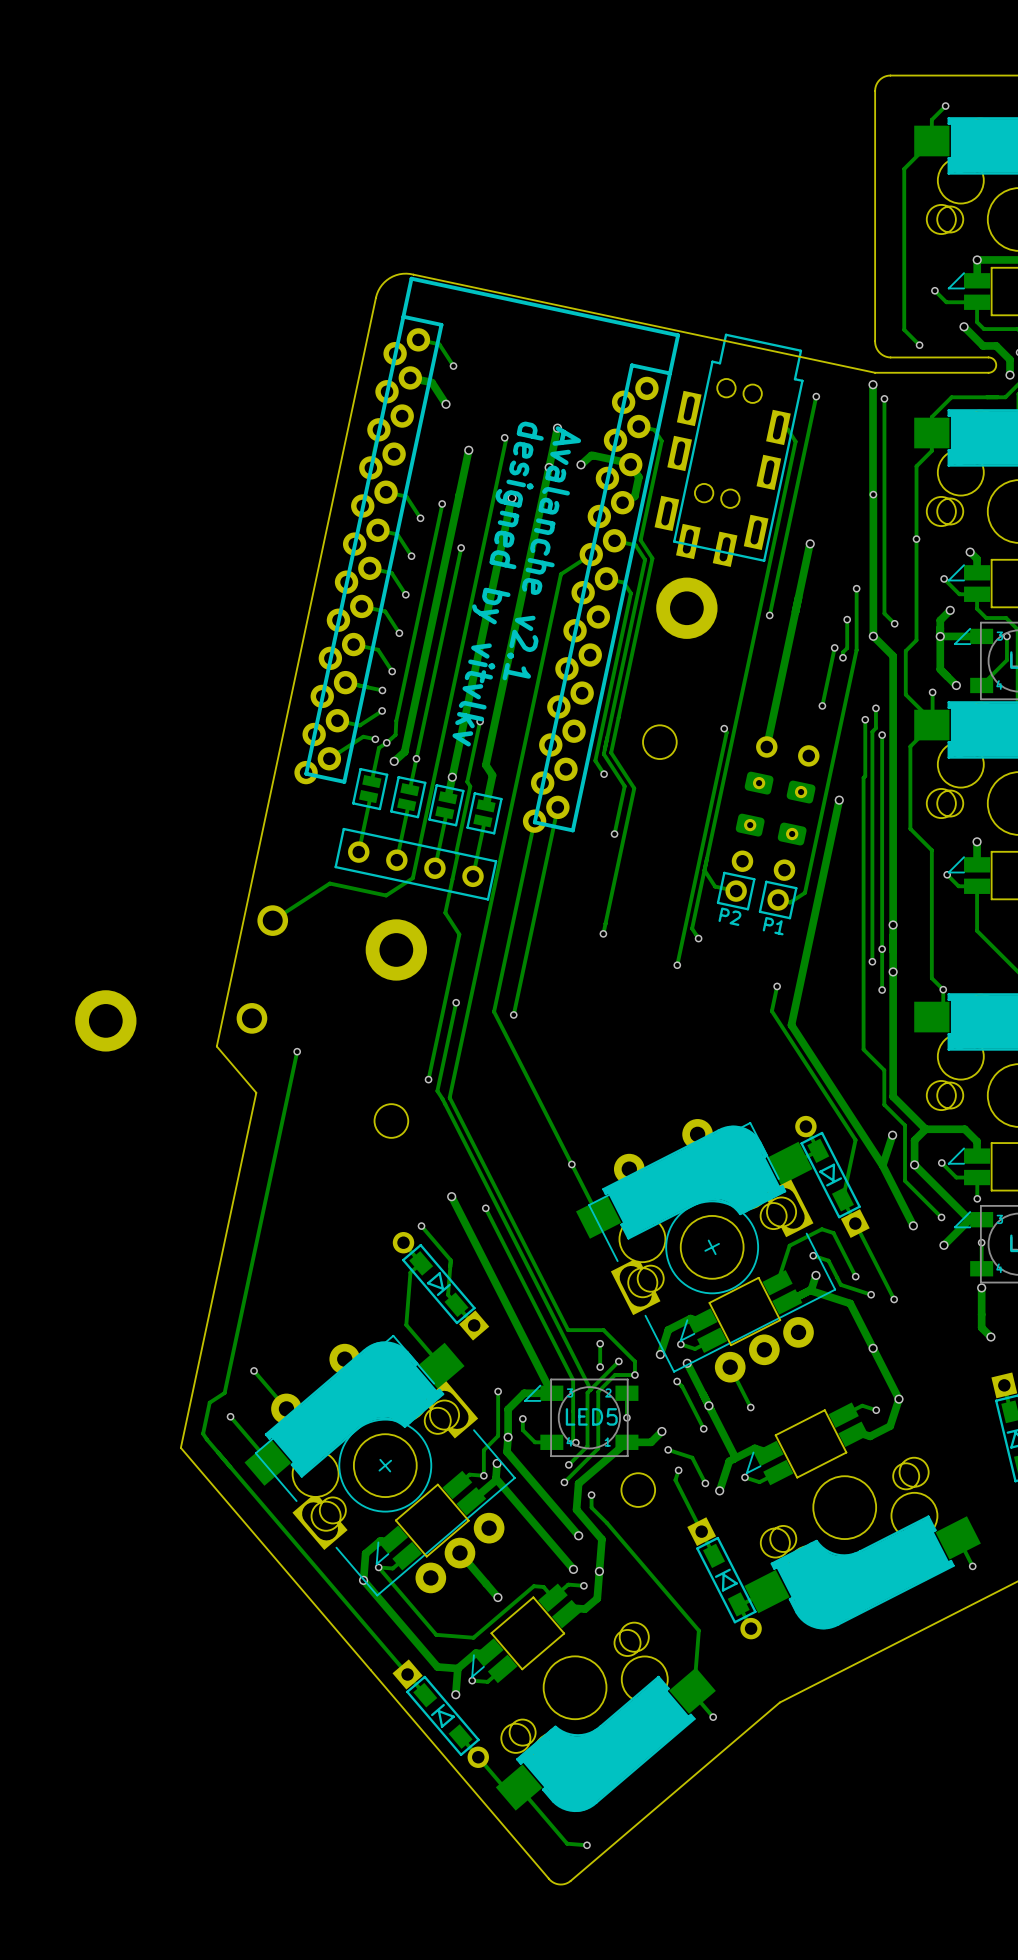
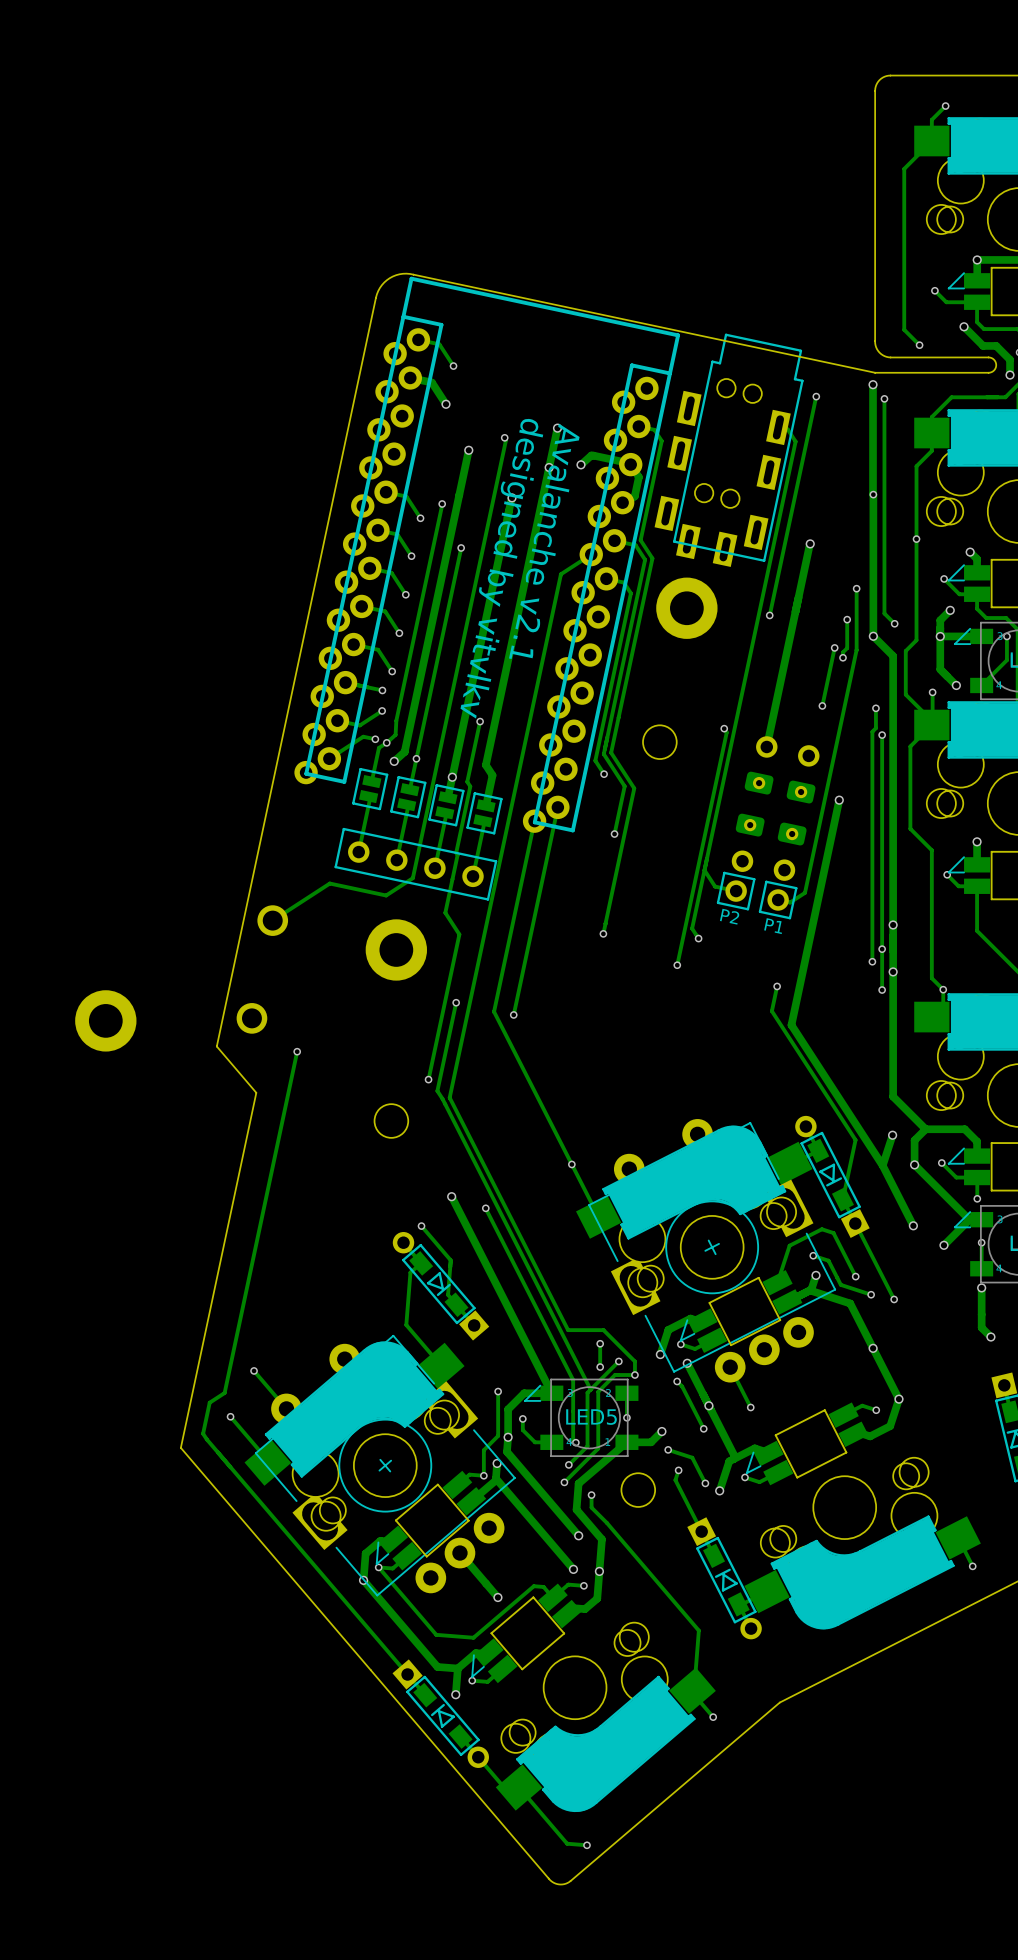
track: (865, 719) (863, 1049) (884, 1070) (884, 1104) (905, 1125) (905, 1180) (941, 1217) -> none
via: (865, 719) -> none
via: (941, 1217) -> none

